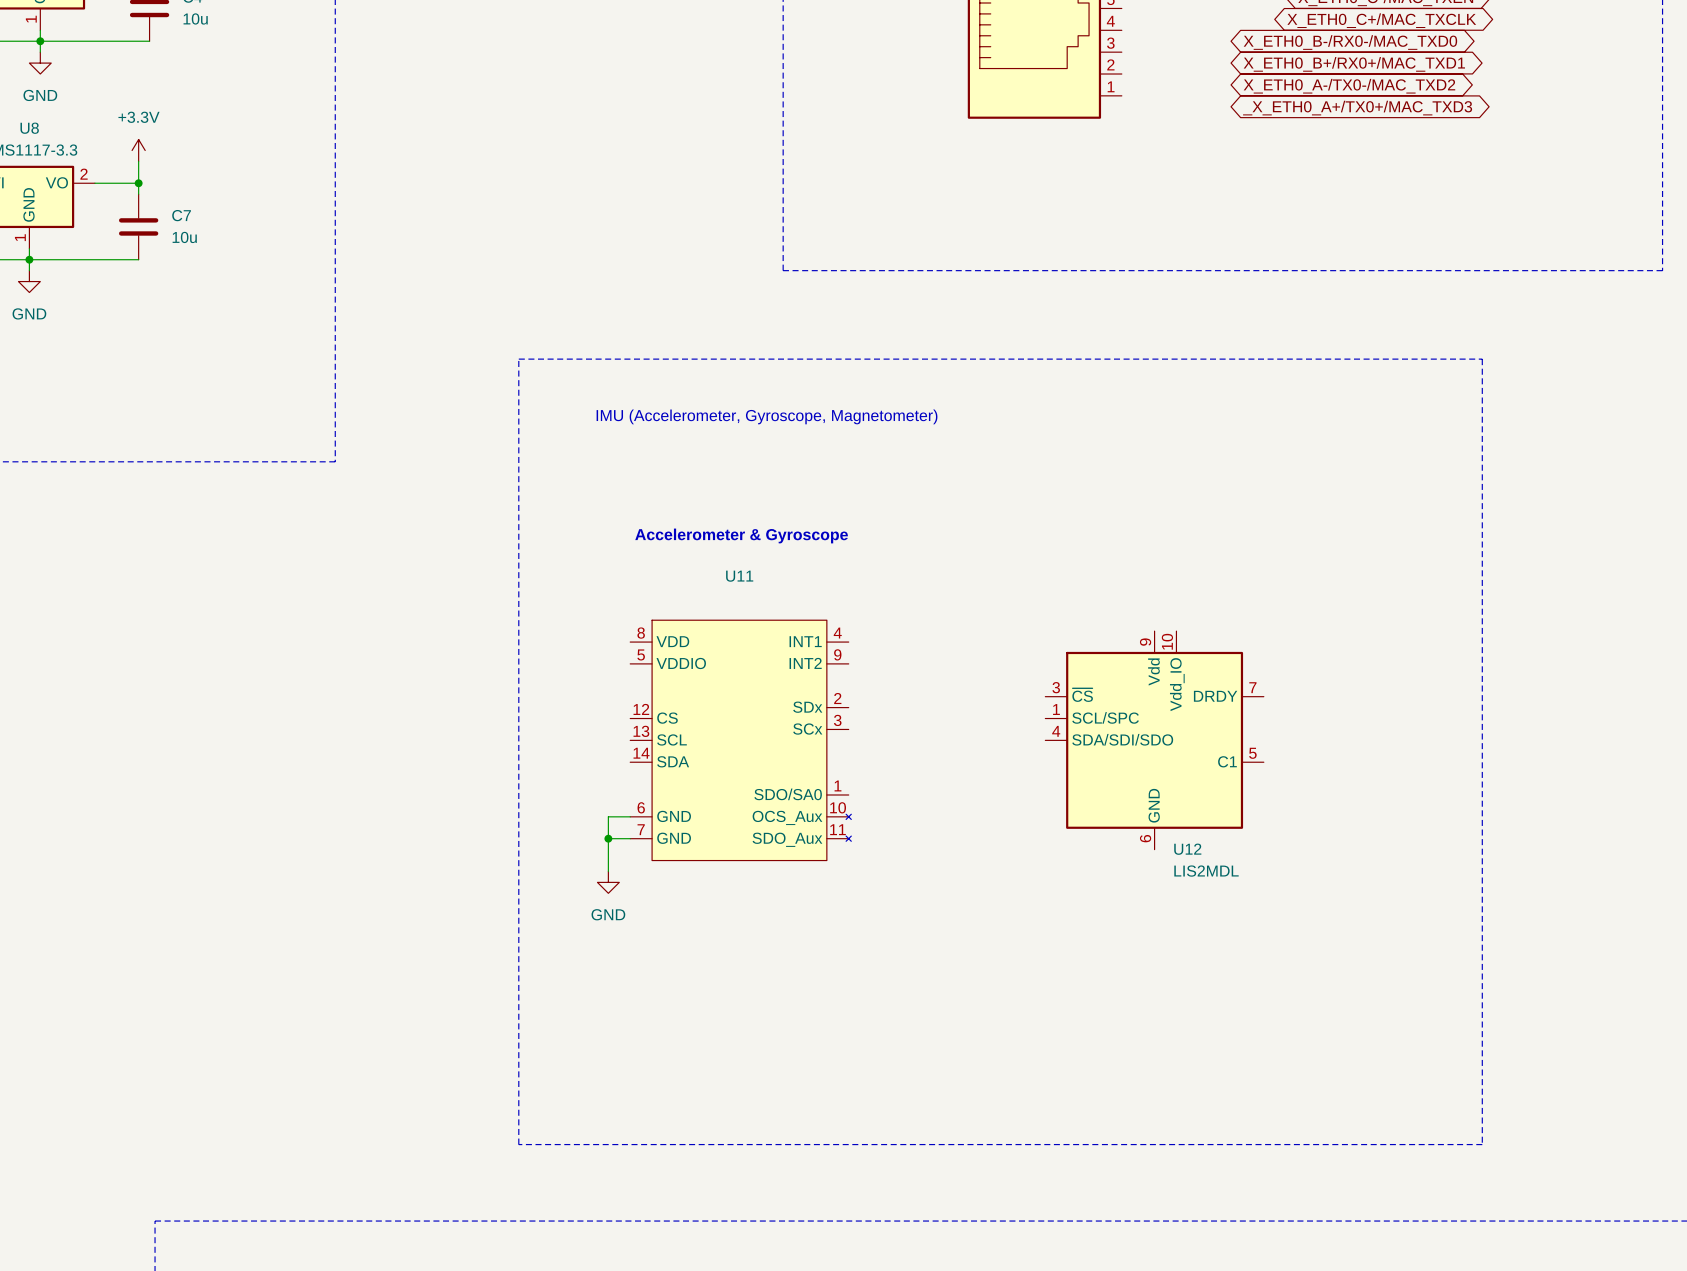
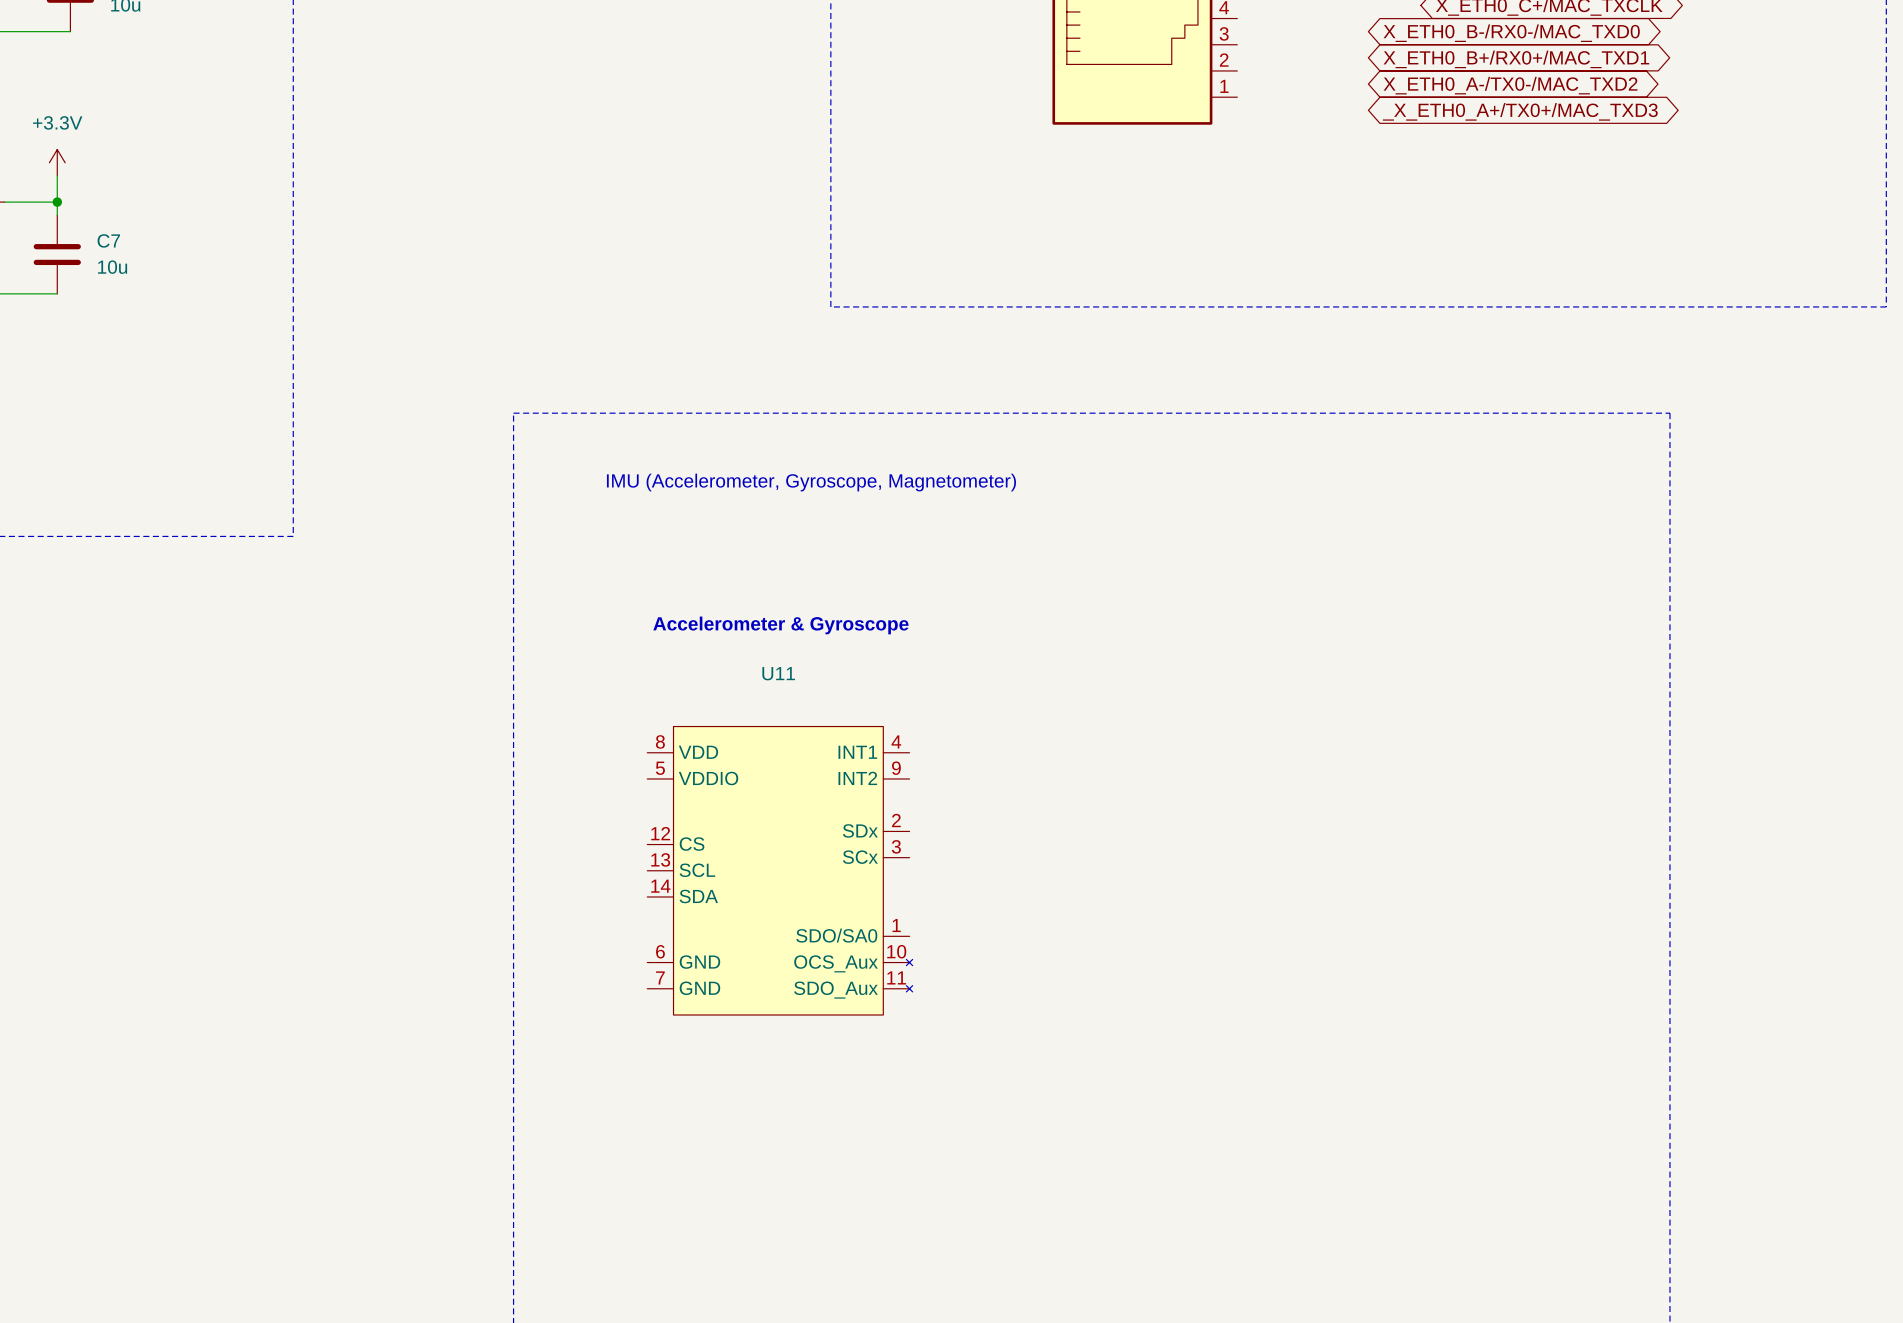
U12: LIS2MDL (1154, 740) -> none
wire: (630, 816) (608, 816) (608, 871) -> none
wire: (608, 838) (630, 838) -> none
junction: (608, 838) -> none
power symbol: GND (608, 882) -> none

